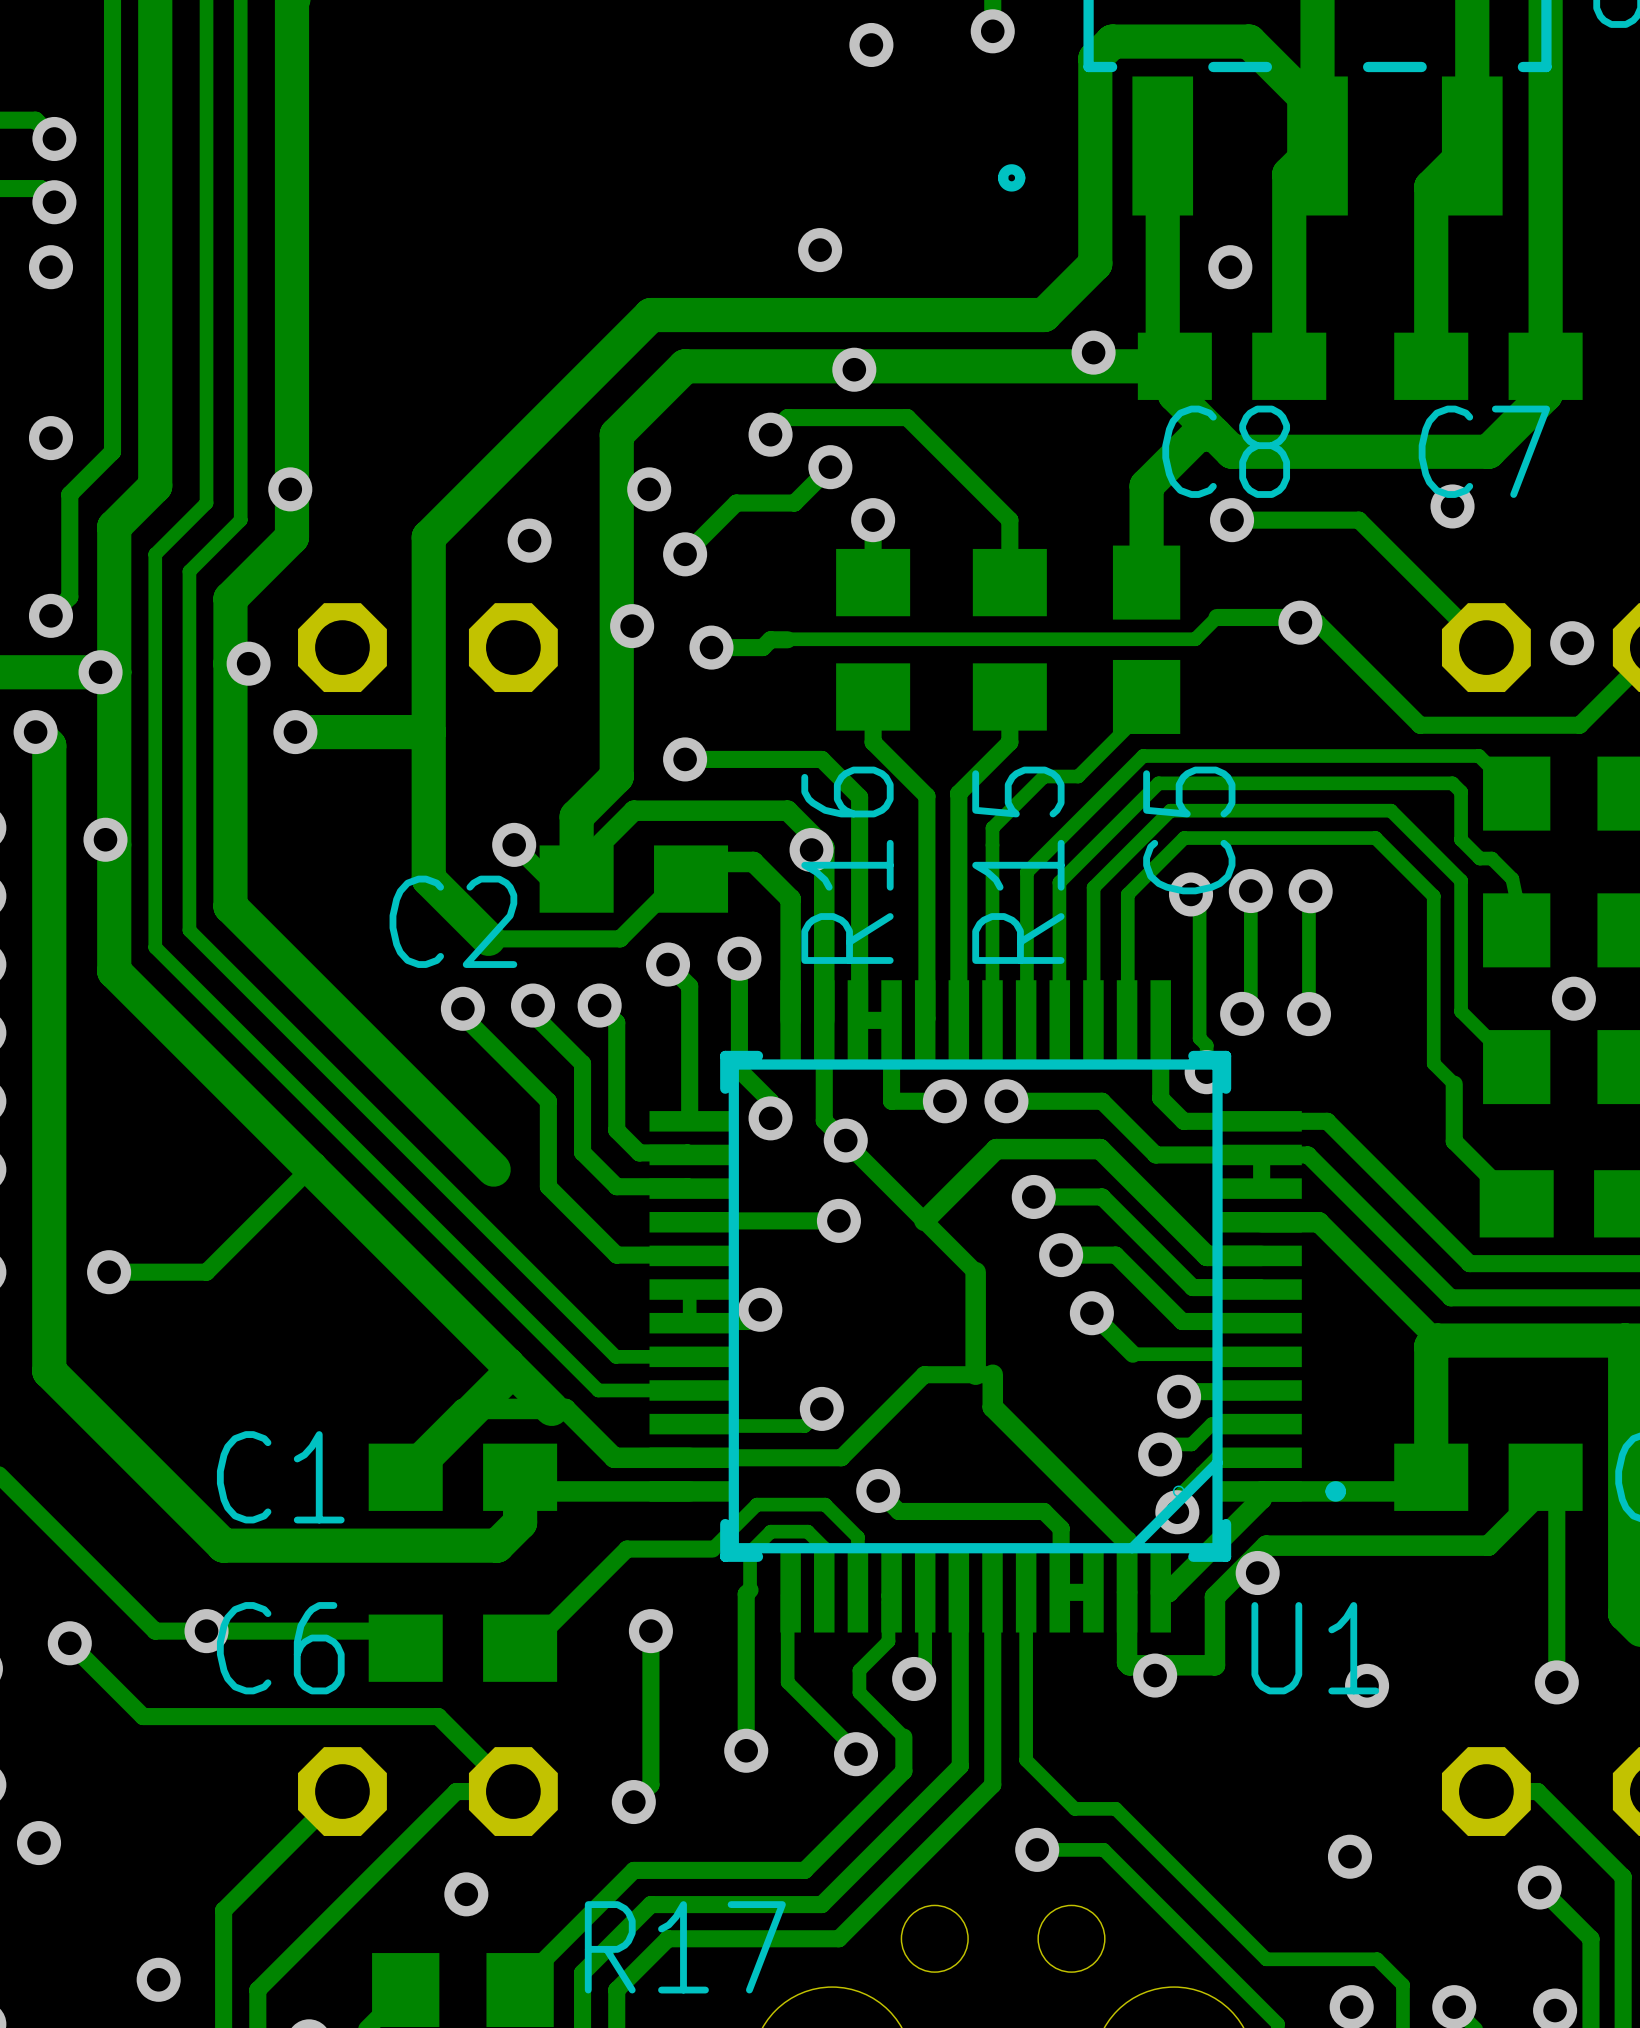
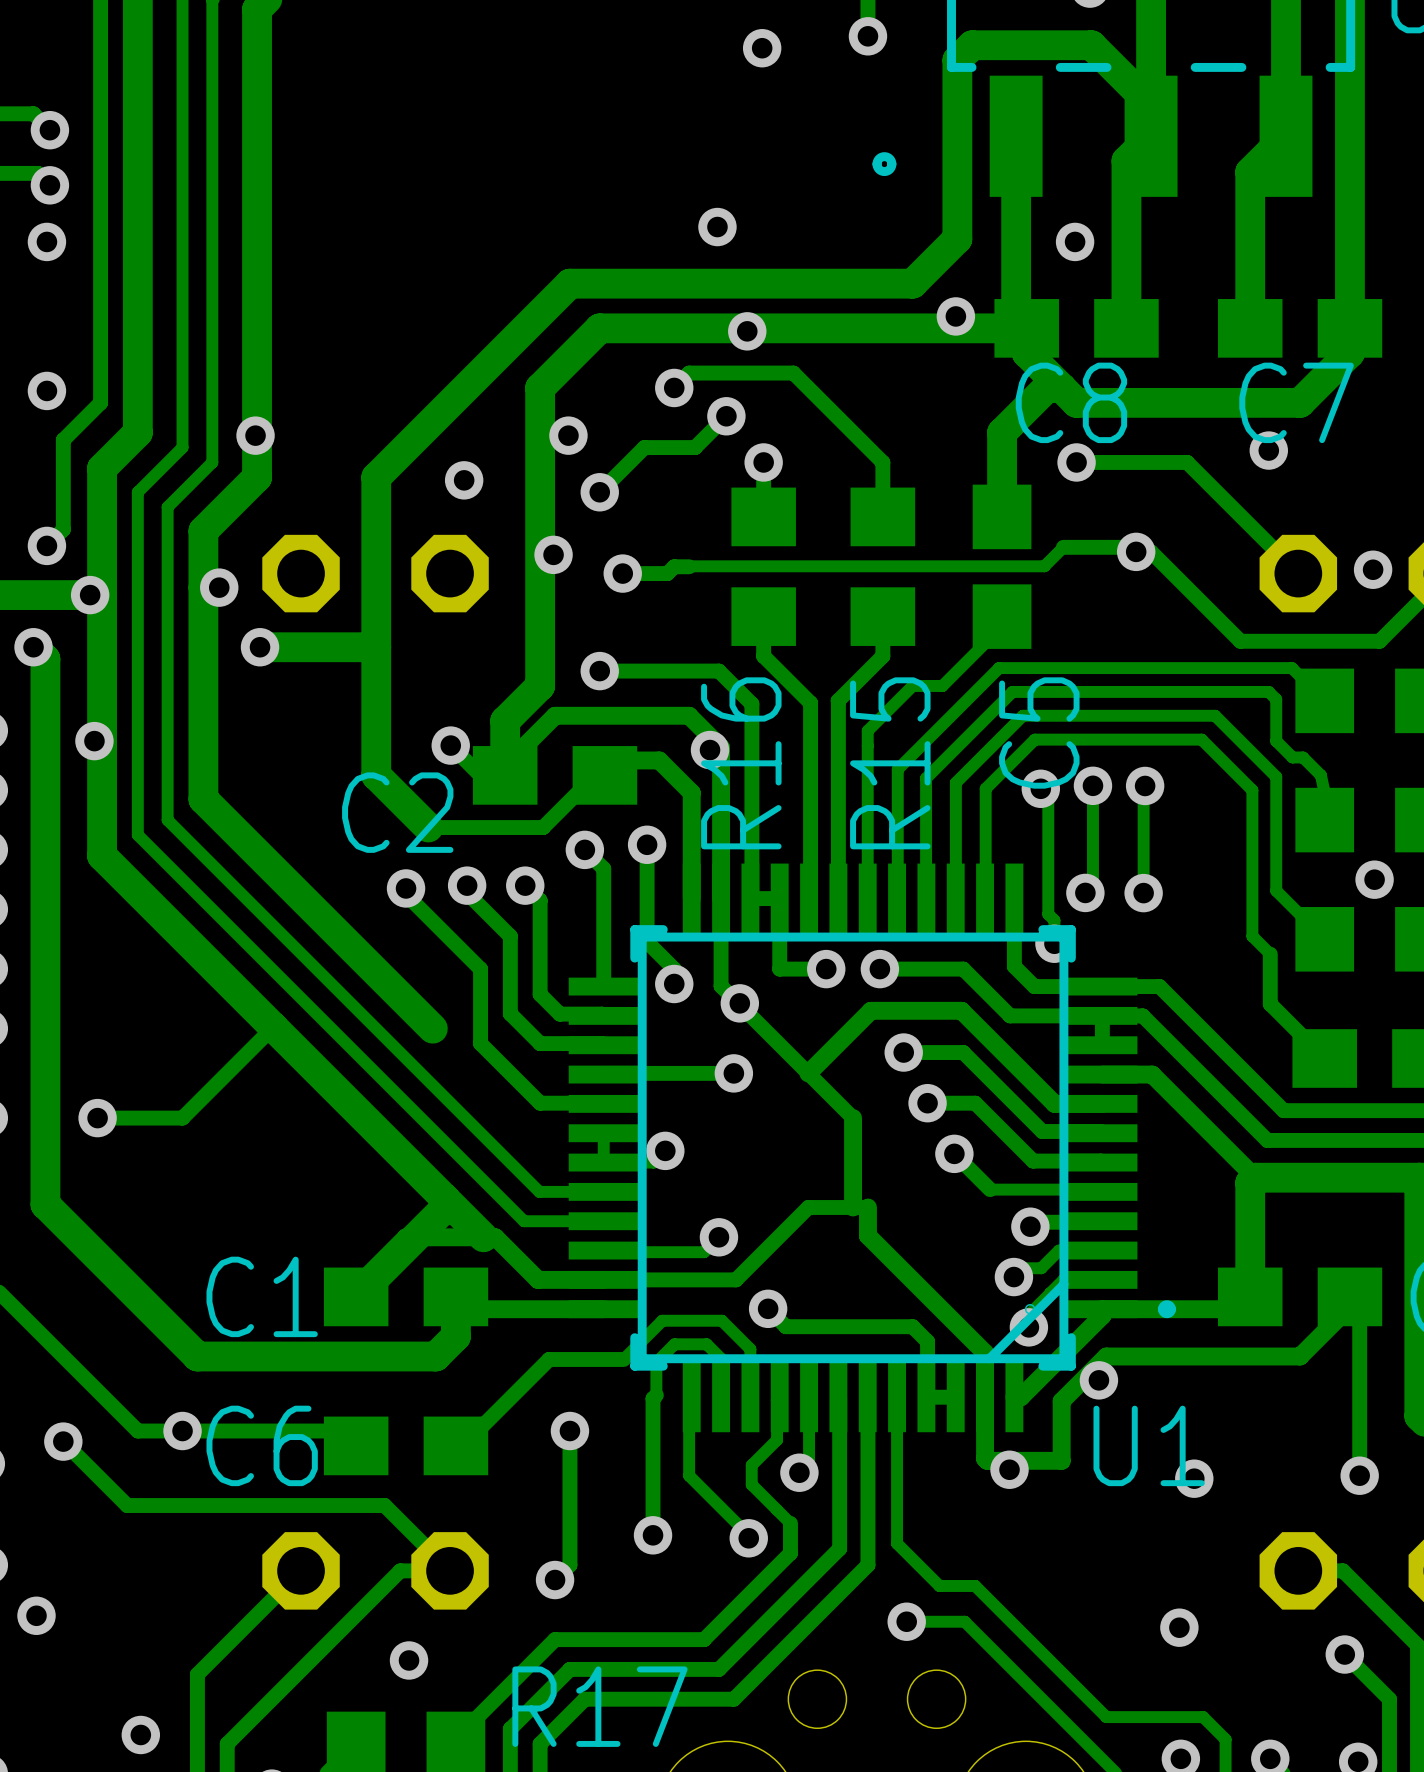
C1 name position: C1 (280, 1477) -> C1 (262, 1296)
C6 name position: C6 (280, 1648) -> C6 (262, 1445)

